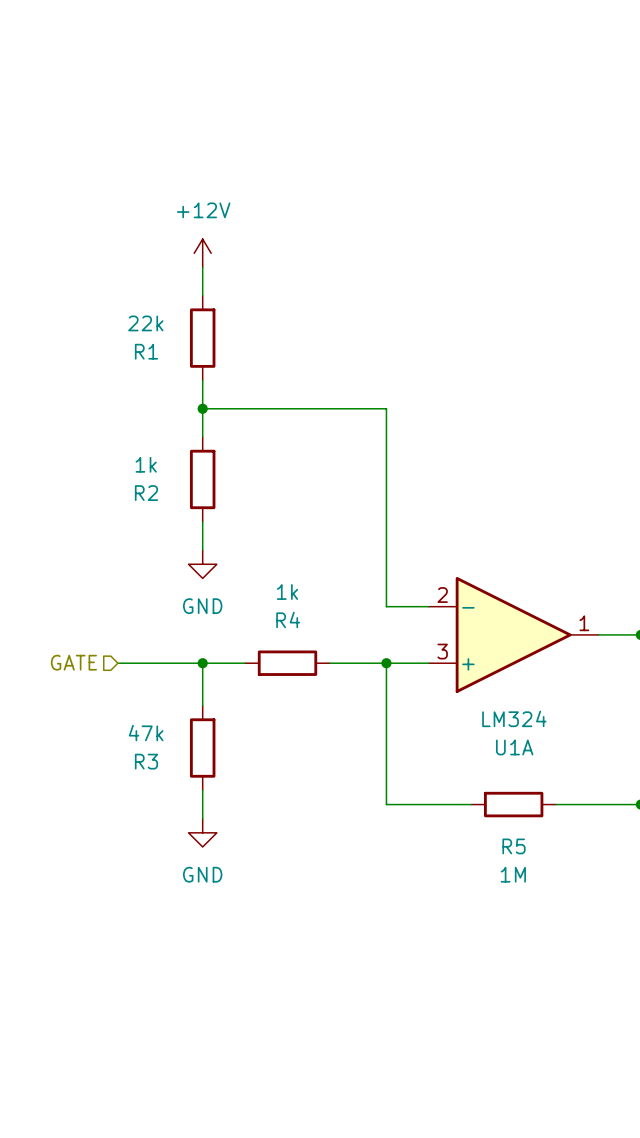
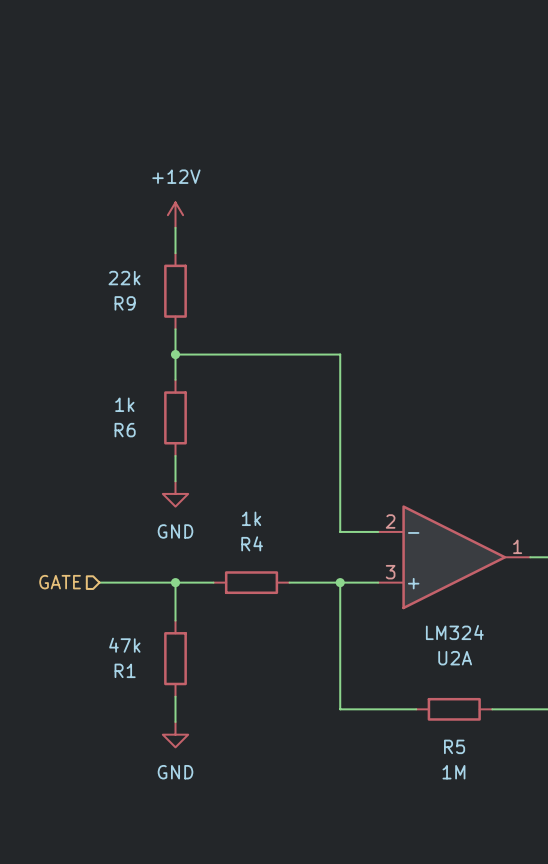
R1 name: R1 (146, 351) -> R9 (125, 303)
R2 name: R2 (146, 493) -> R6 (125, 430)
U1A name: U1A (514, 747) -> U2A (455, 658)
R3 name: R3 (146, 761) -> R1 (125, 670)

